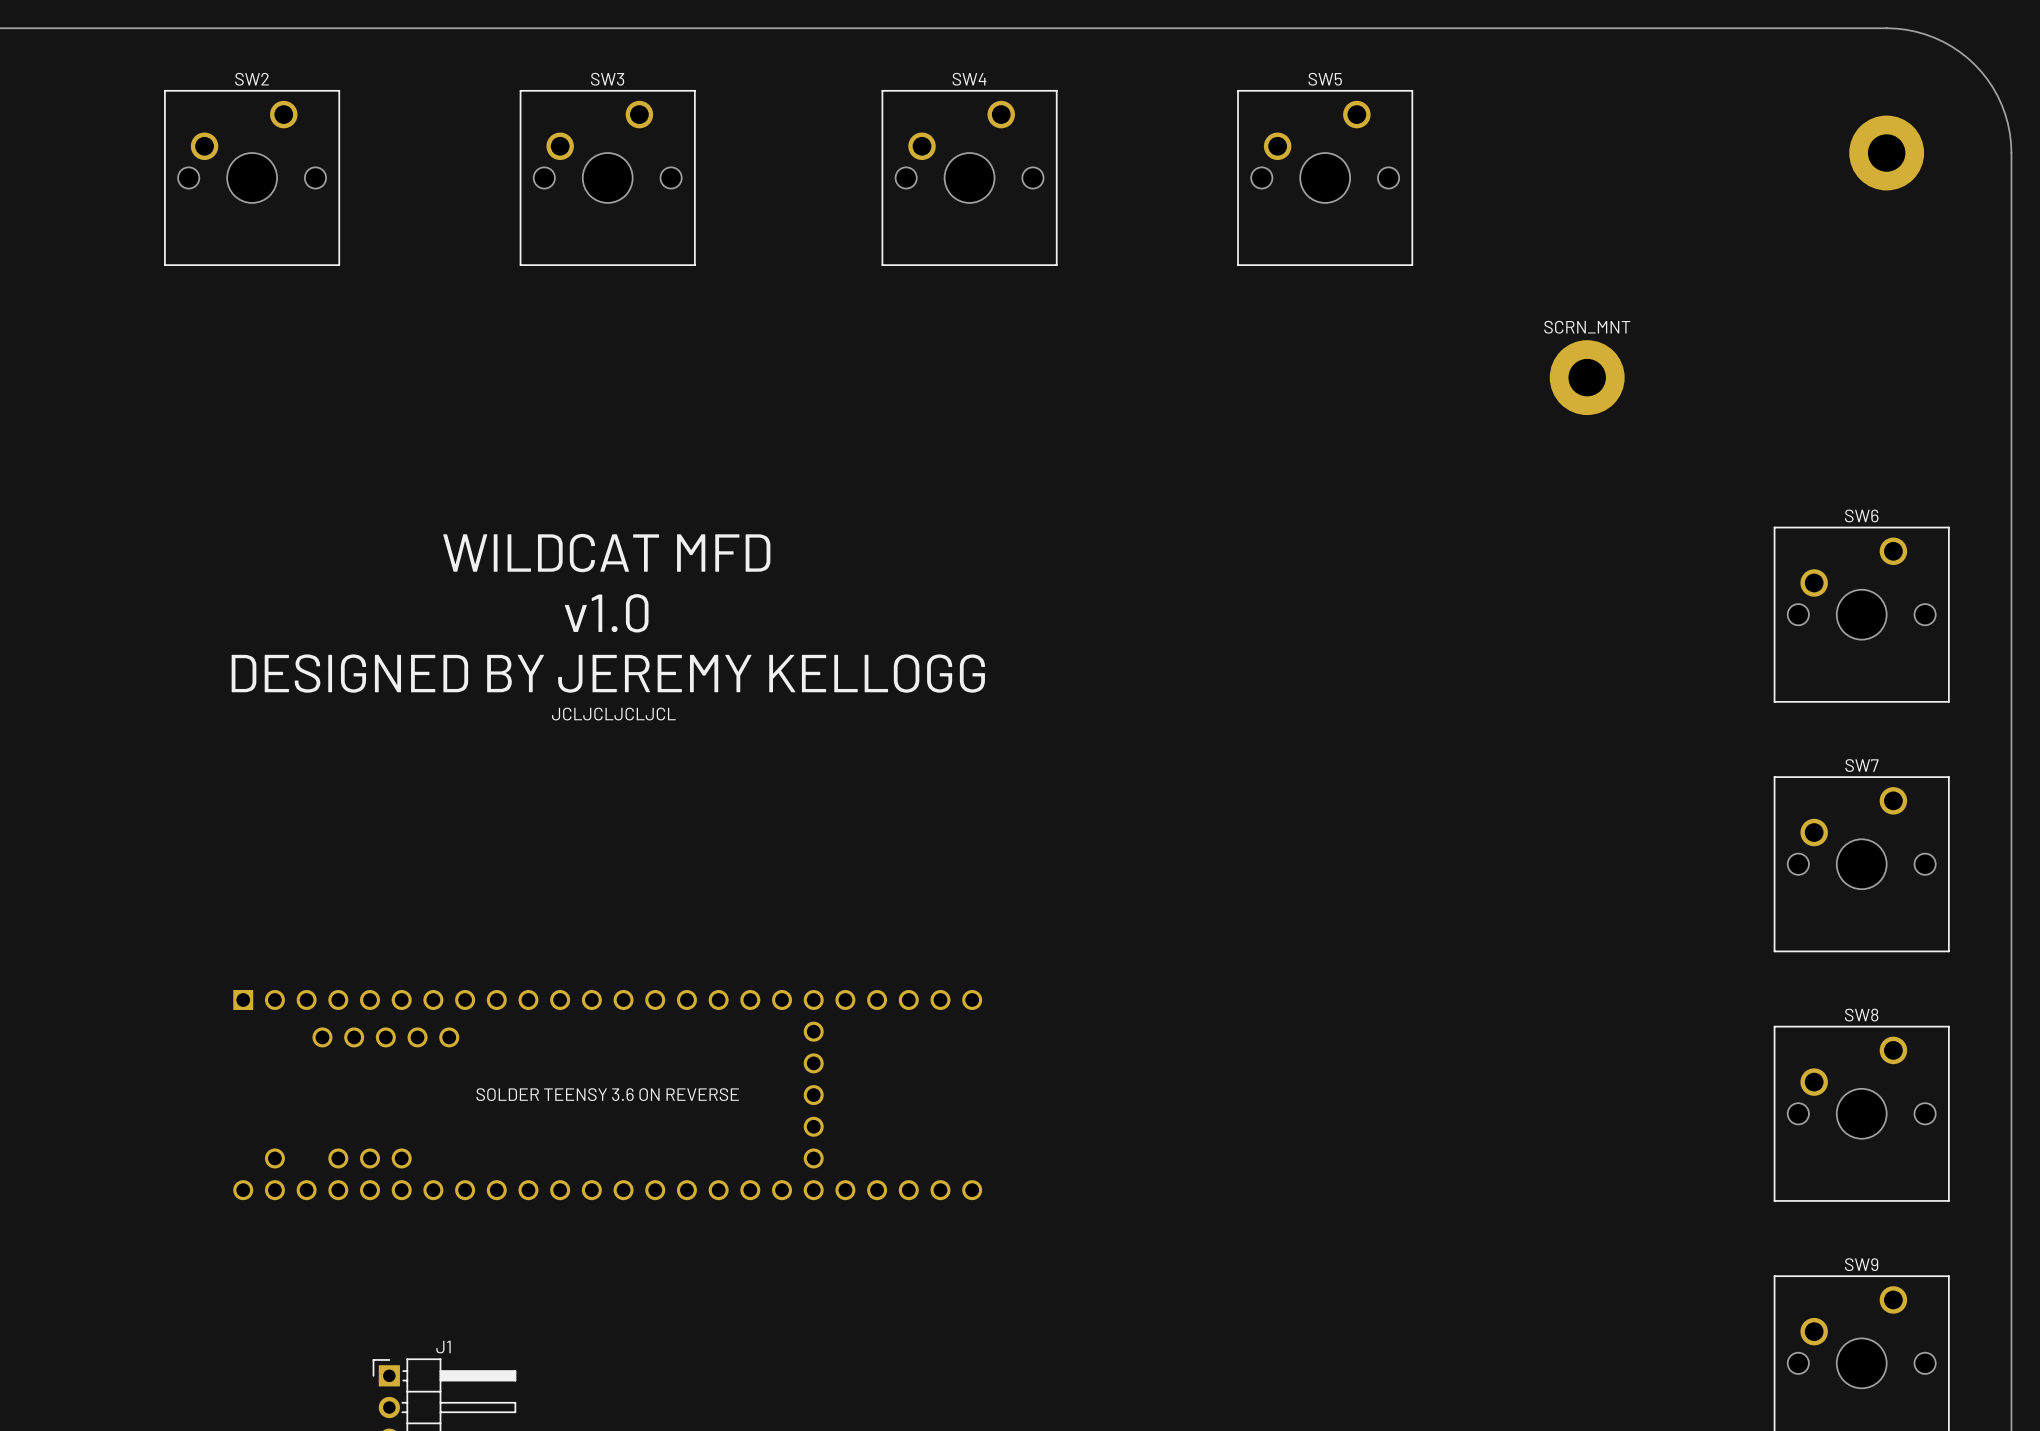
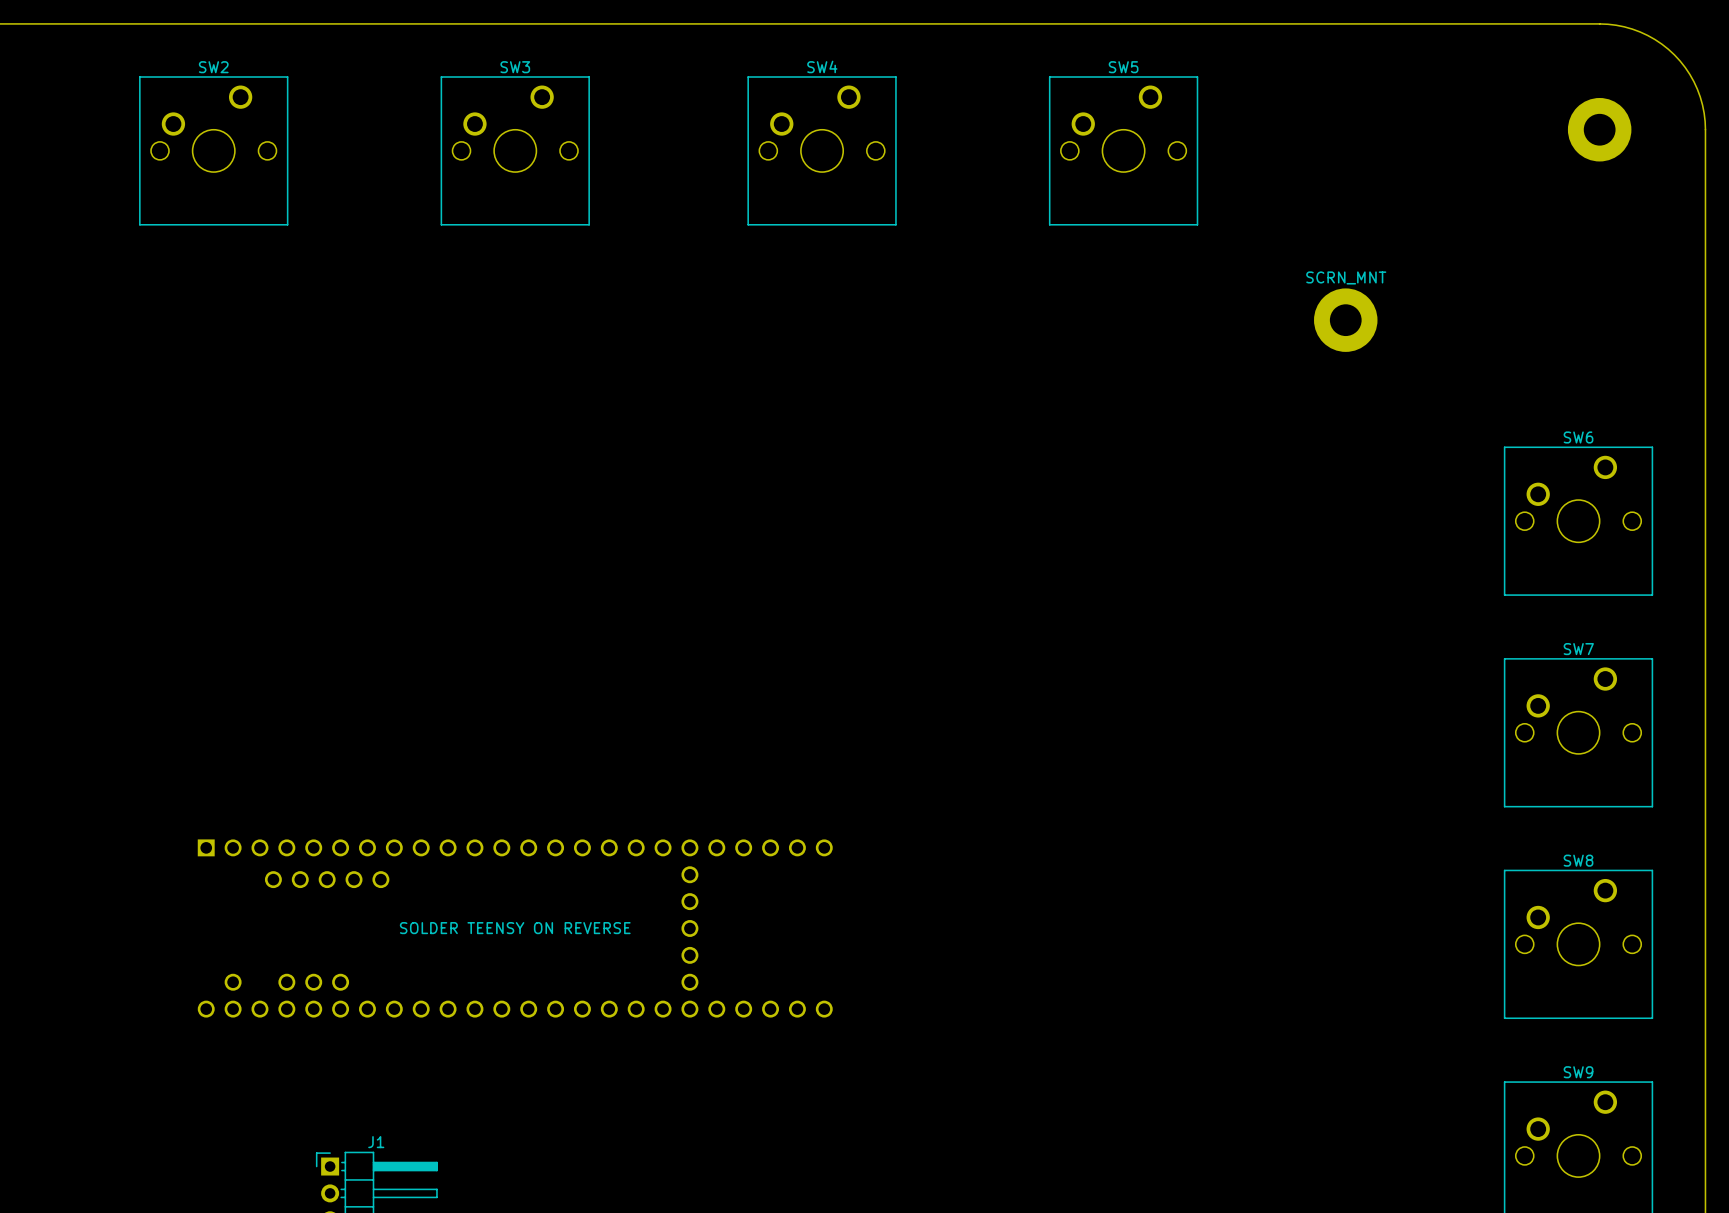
text: WILDCAT MFD (606, 553) -> none
text: v1.0 (606, 613) -> none
text: DESIGNED BY JEREMY KELLOGG (608, 673) -> none
text: JCLJCLJCLJCL (613, 714) -> none
text: SOLDER TEENSY 3.6 ON REVERSE (607, 1094) -> SOLDER TEENSY ON REVERSE (515, 928)

